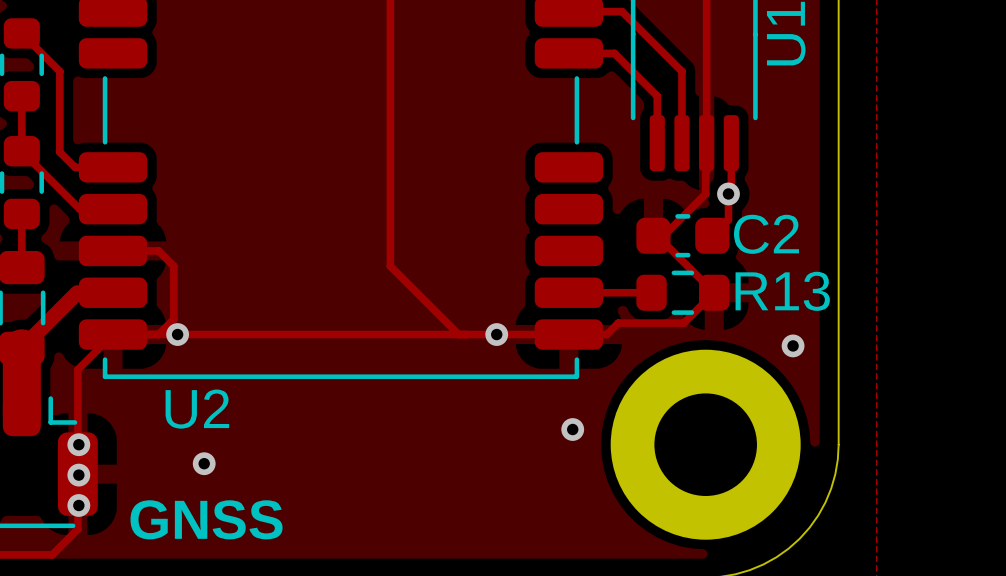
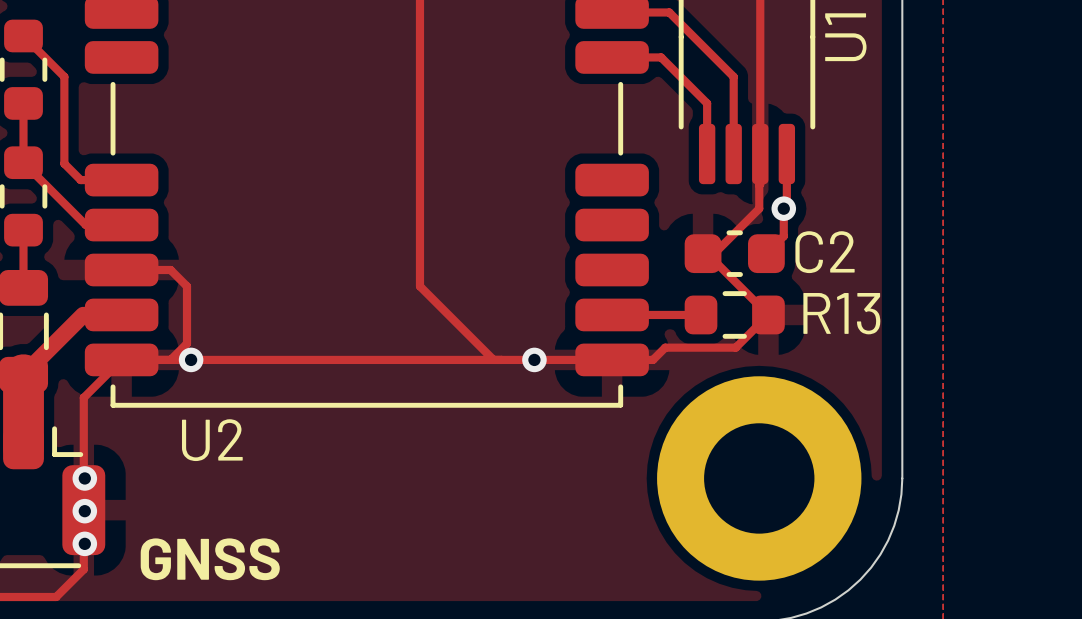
via: (793, 345) -> none
via: (572, 429) -> none
via: (204, 463) -> none

